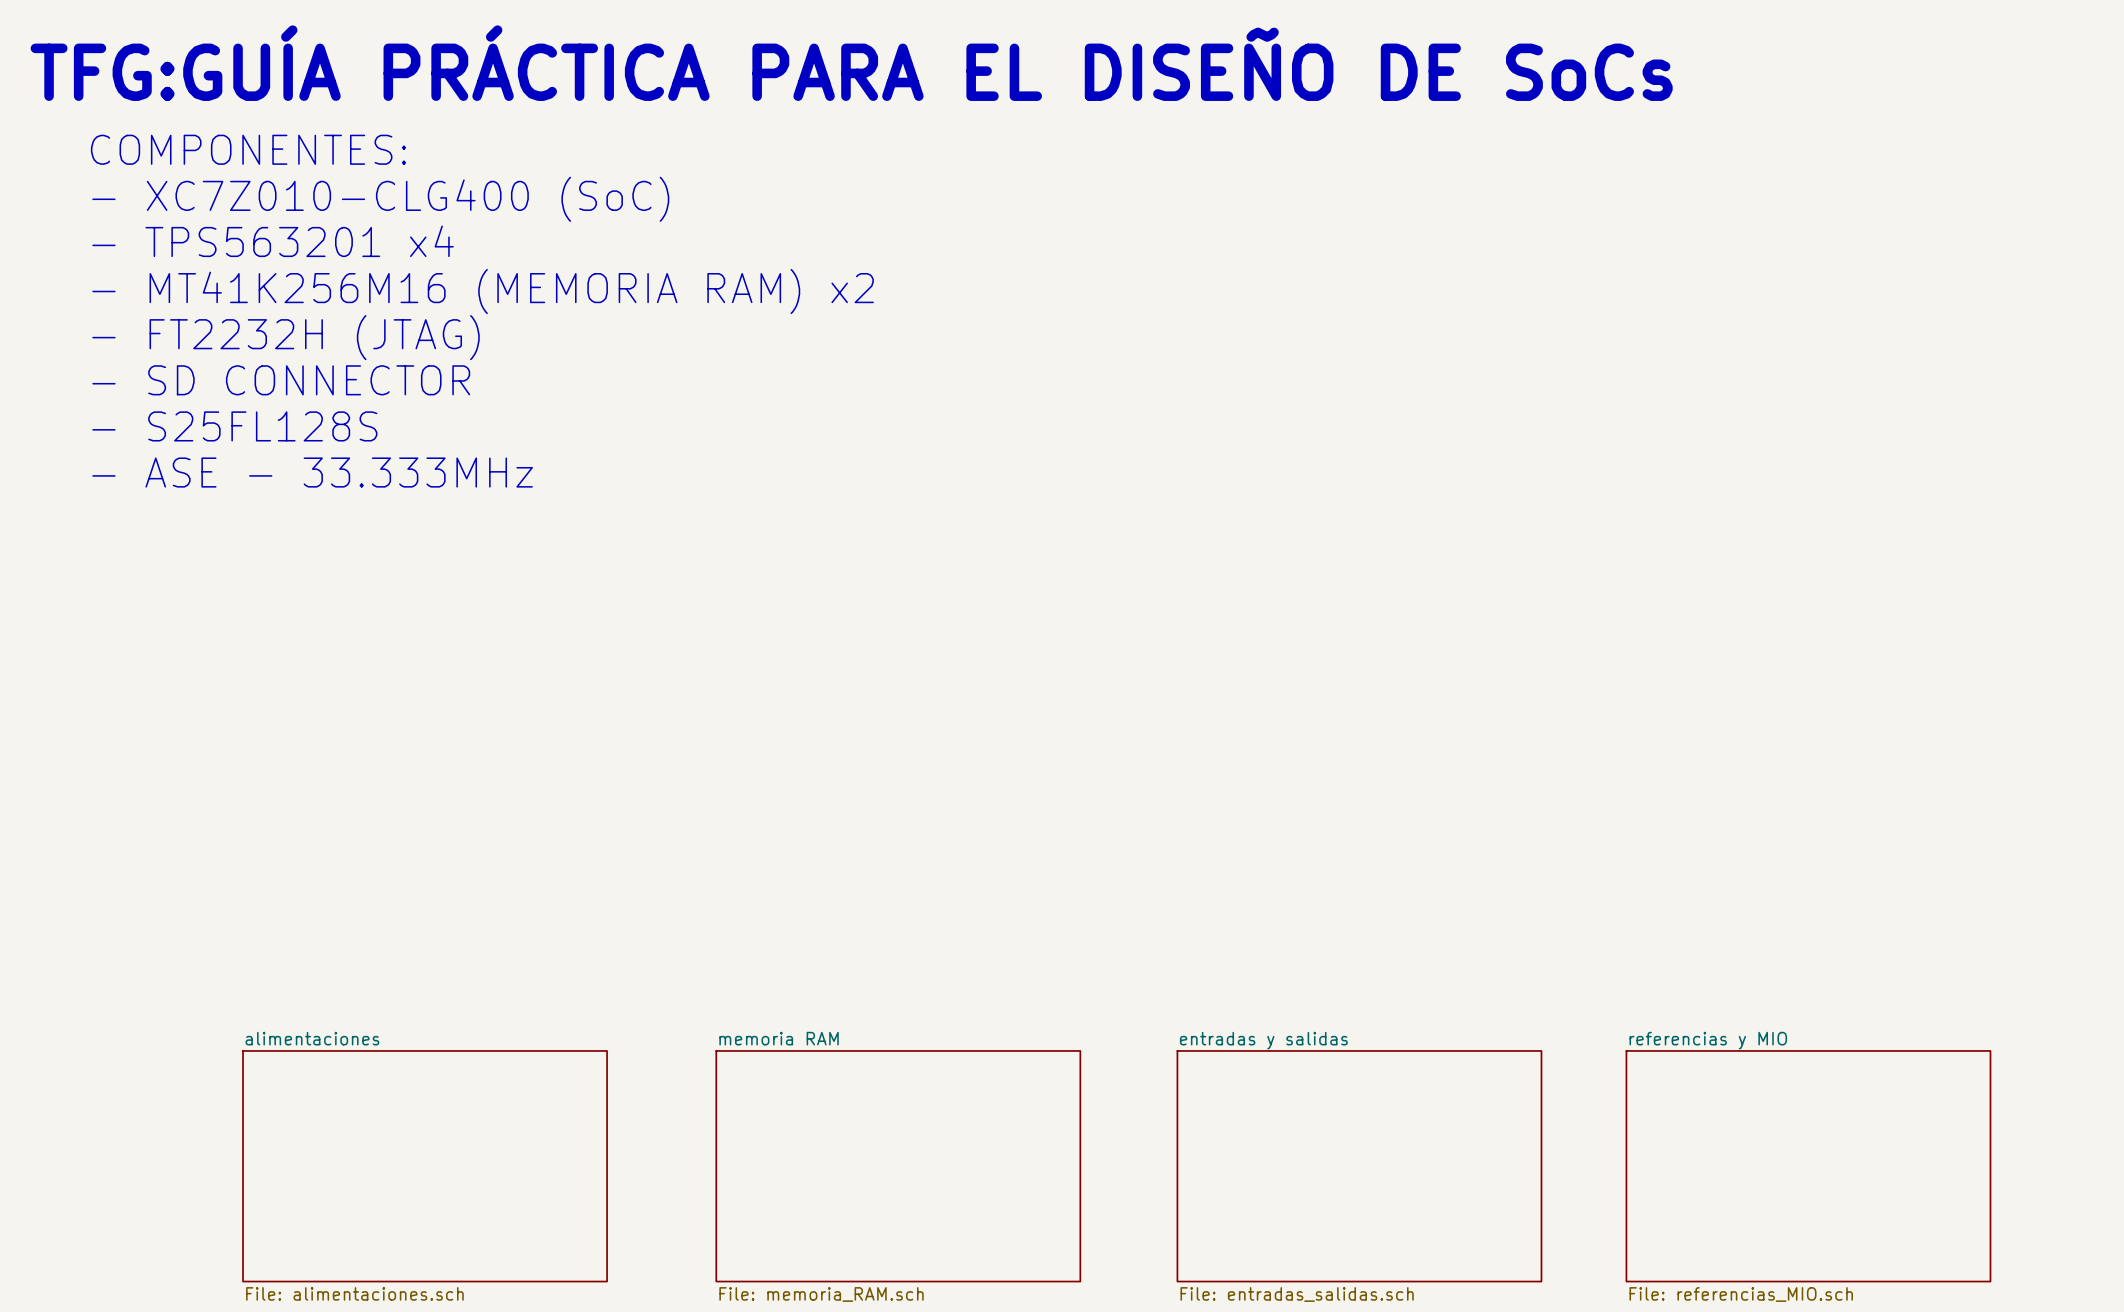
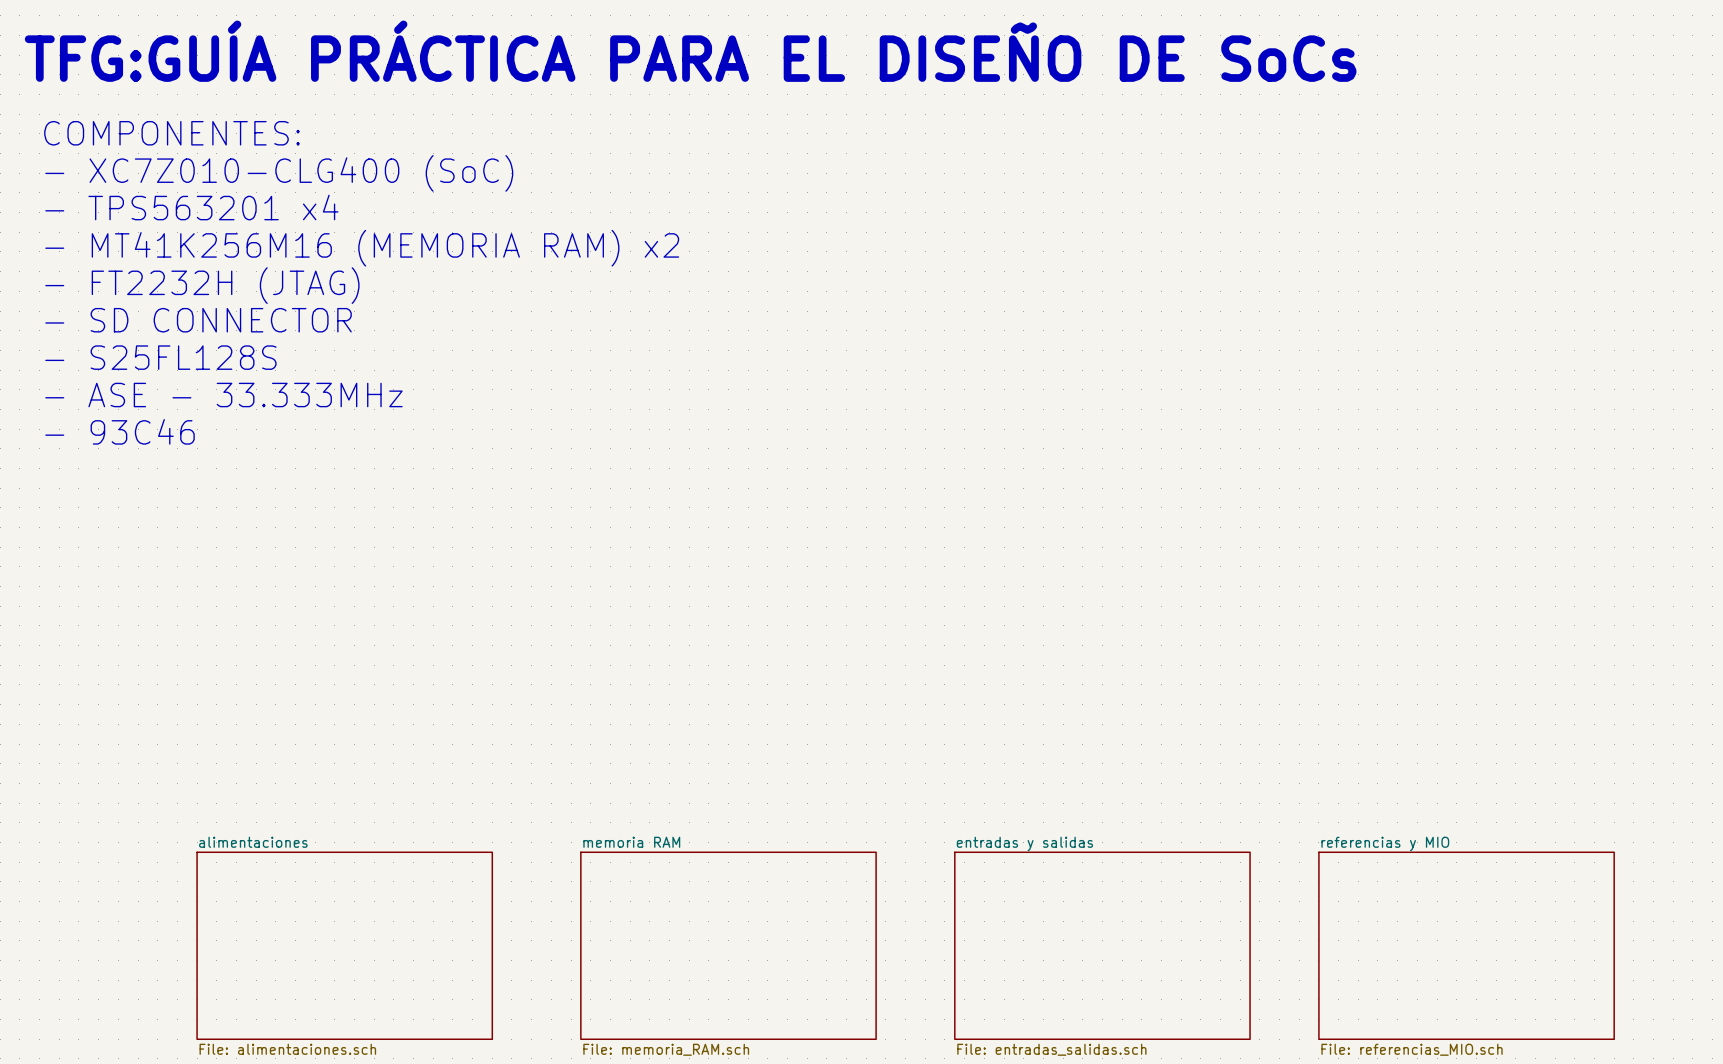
text position: COMPONENTES: (248, 149) -> COMPONENTES: (171, 133)
text position: - XC7Z010-CLG400 (SoC) (380, 199) -> - XC7Z010-CLG400 (SoC) (279, 173)
text position: - TPS563201 x4 (273, 241) -> - TPS563201 x4 (191, 207)
text position: - MT41K256M16 (MEMORIA RAM) x2 (483, 291) -> - MT41K256M16 (MEMORIA RAM) x2 (362, 248)
text position: - FT2232H (JTAG) (285, 337) -> - FT2232H (JTAG) (202, 285)
text position: - SD CONNECTOR (281, 380) -> - SD CONNECTOR (198, 320)
text position: - S25FL128S (234, 426) -> - S25FL128S (160, 357)
text position: - ASE - 33.333MHz (312, 472) -> - ASE - 33.333MHz (223, 395)
text: none -> - 93C46 (120, 431)

